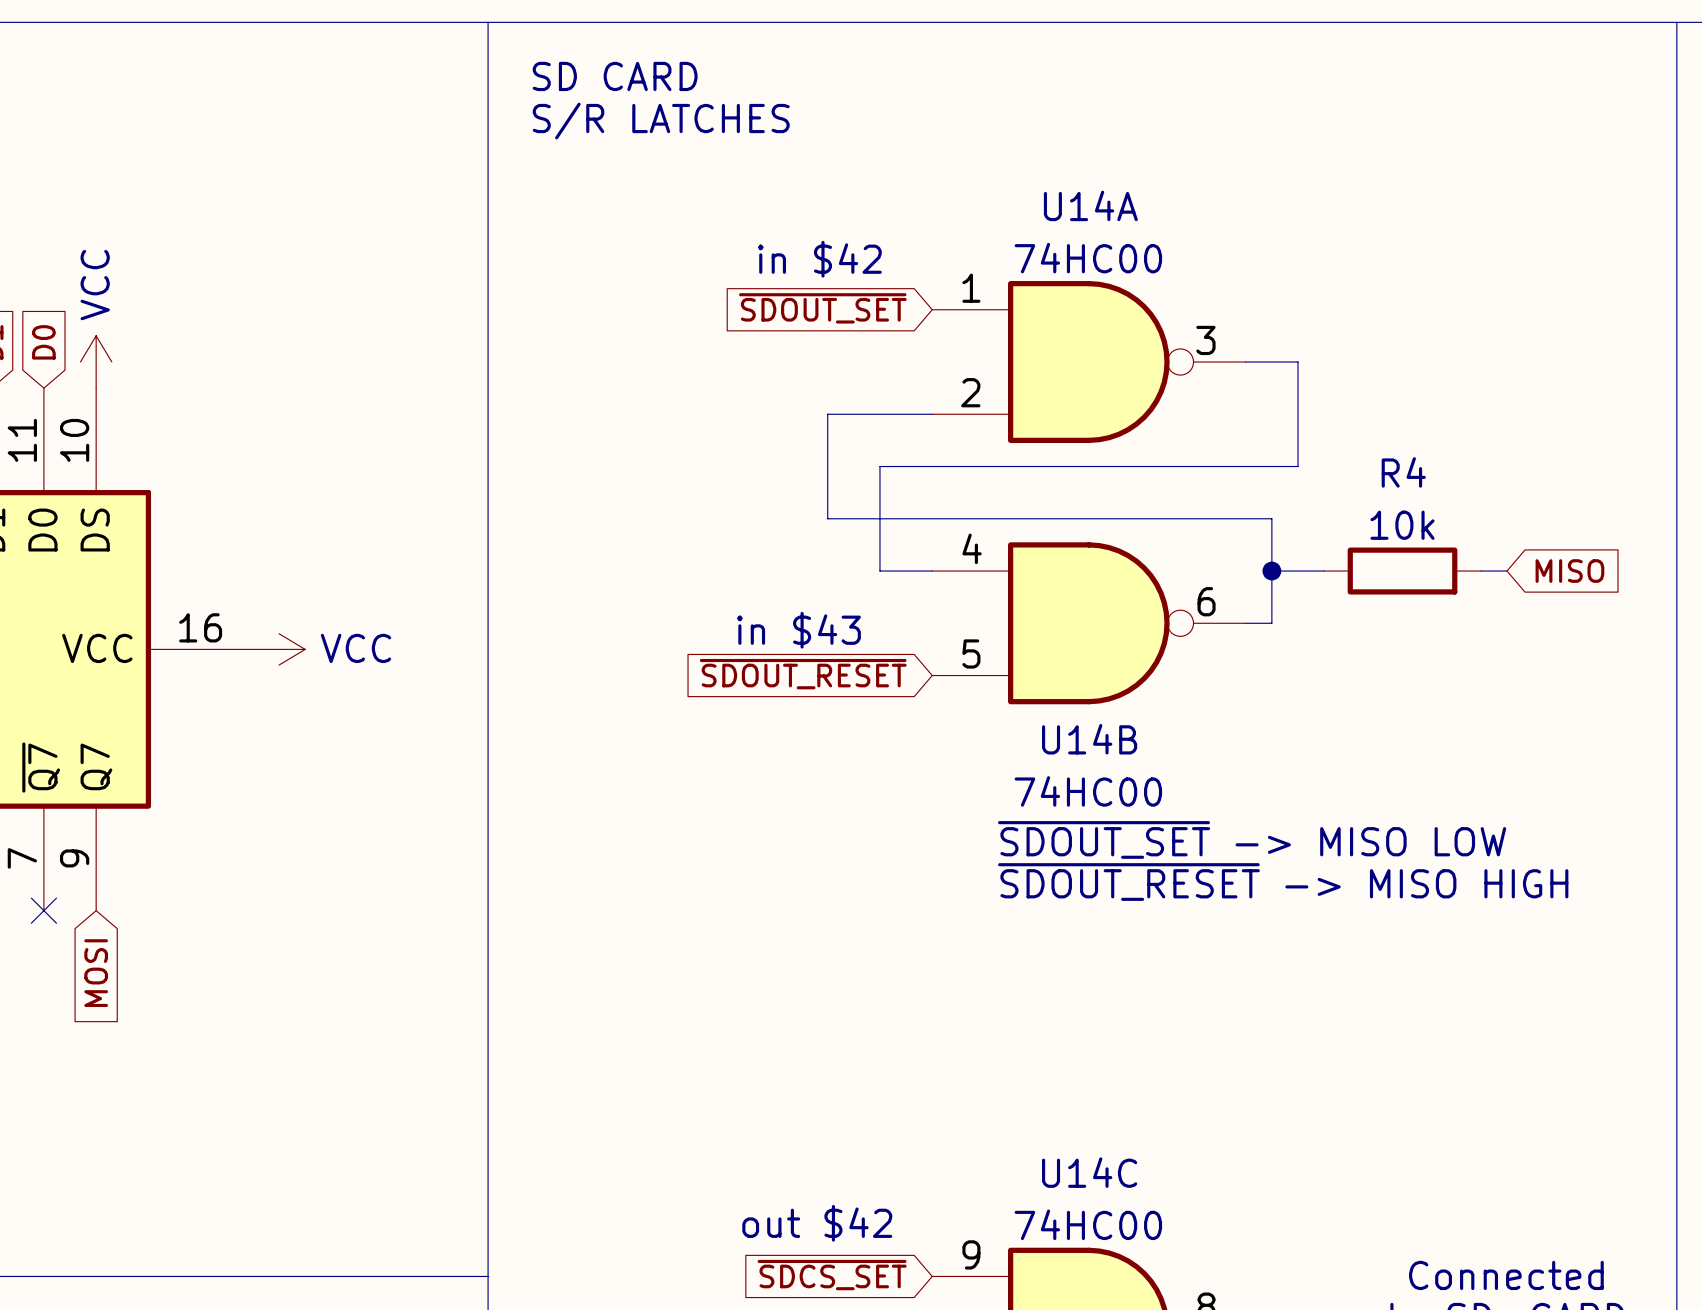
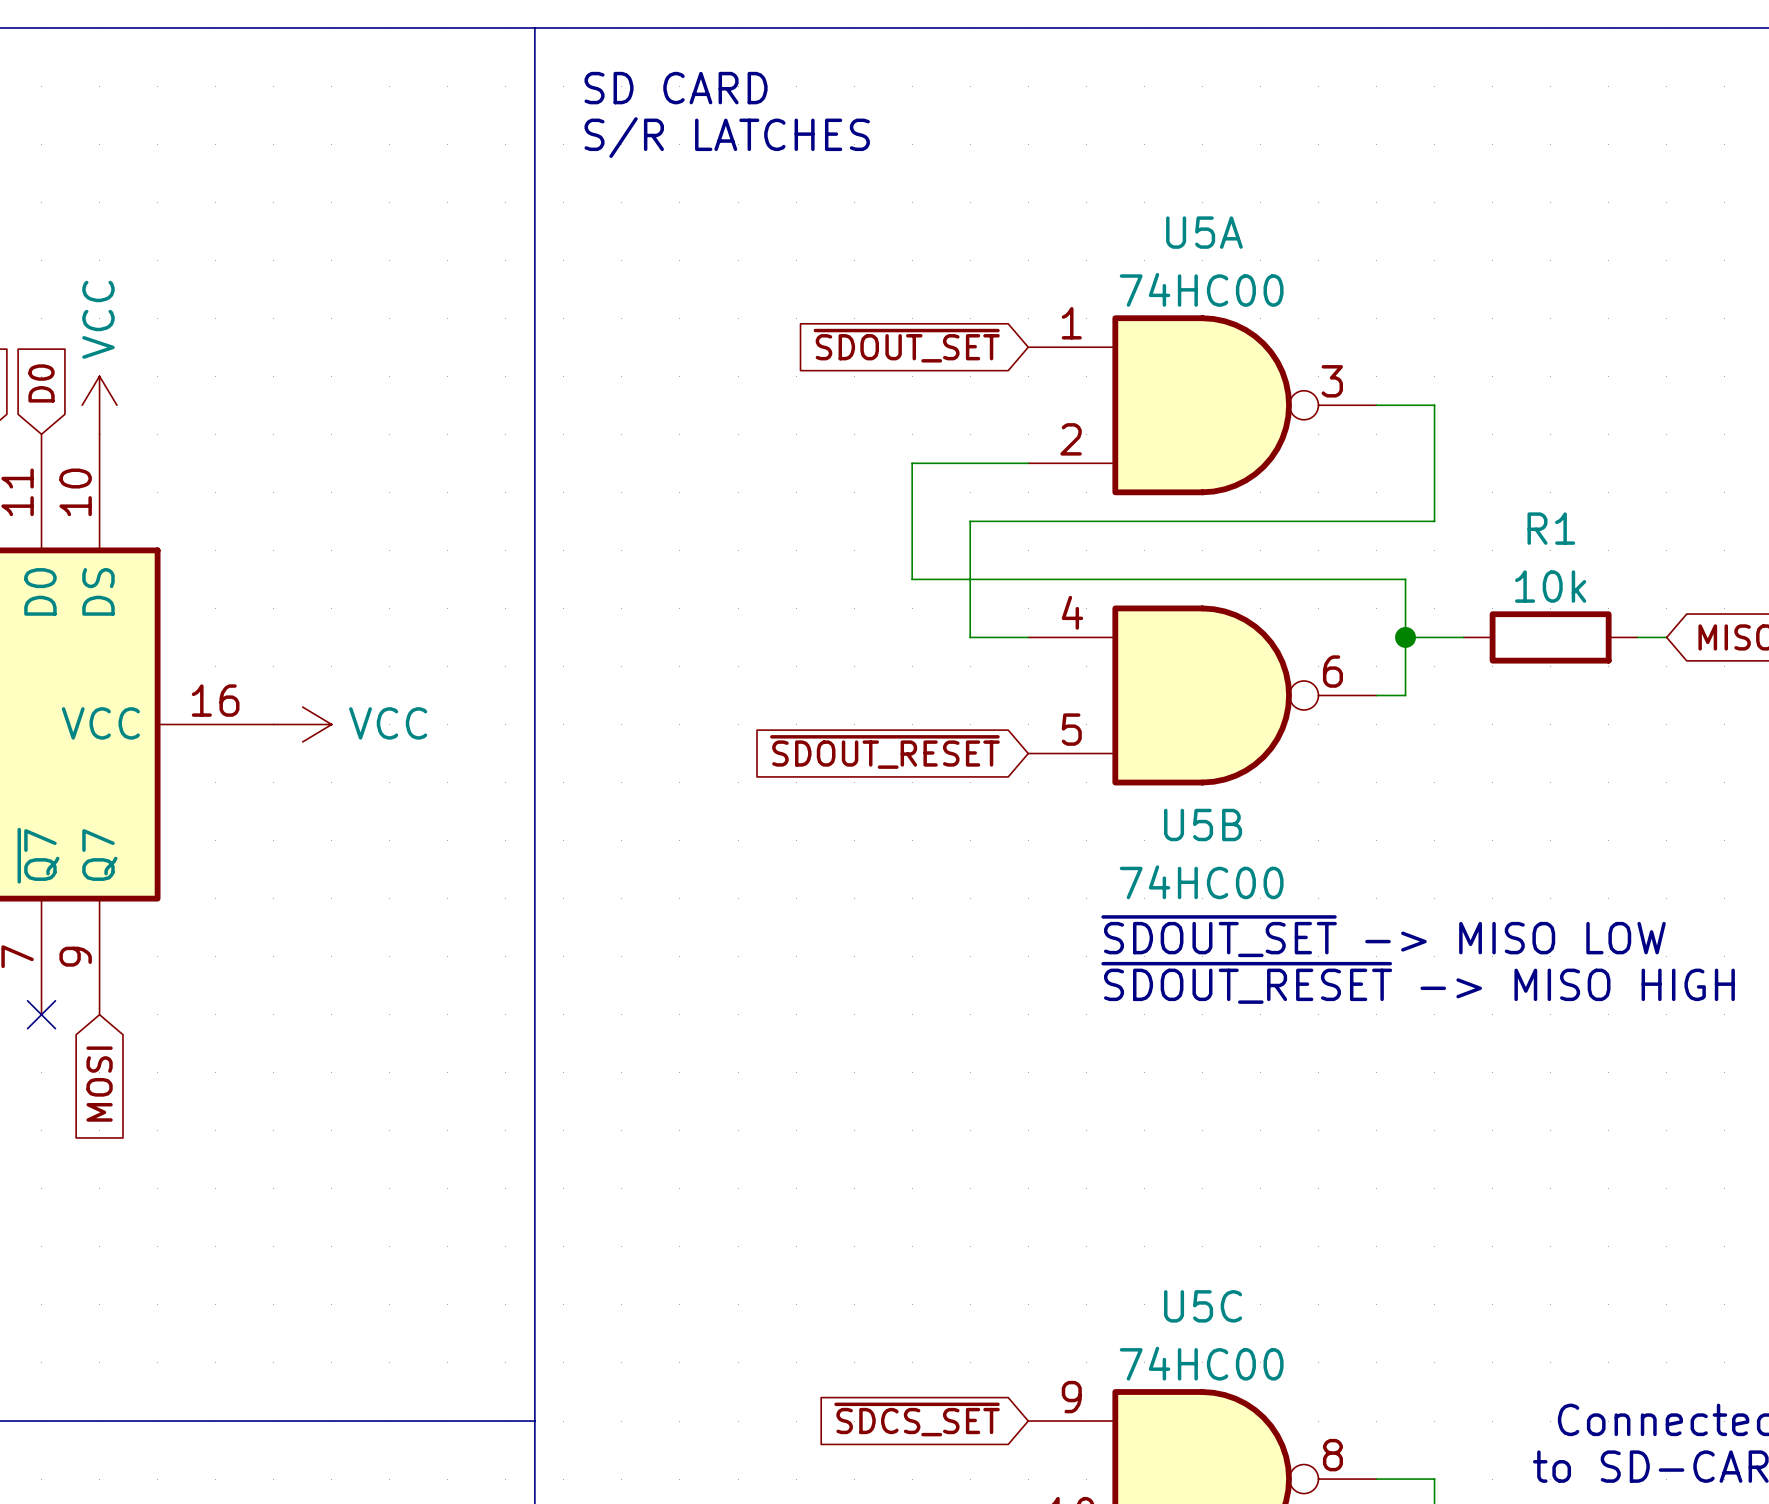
U14A name: U14A (1090, 205) -> U5A (1204, 232)
text: in $42 (819, 259) -> none
R4 name: R4 (1403, 472) -> R1 (1551, 528)
text: in $43 (798, 630) -> none
U14B name: U14B (1089, 739) -> U5B (1203, 824)
U14C name: U14C (1089, 1172) -> U5C (1203, 1306)
text: out $42 (817, 1223) -> none

